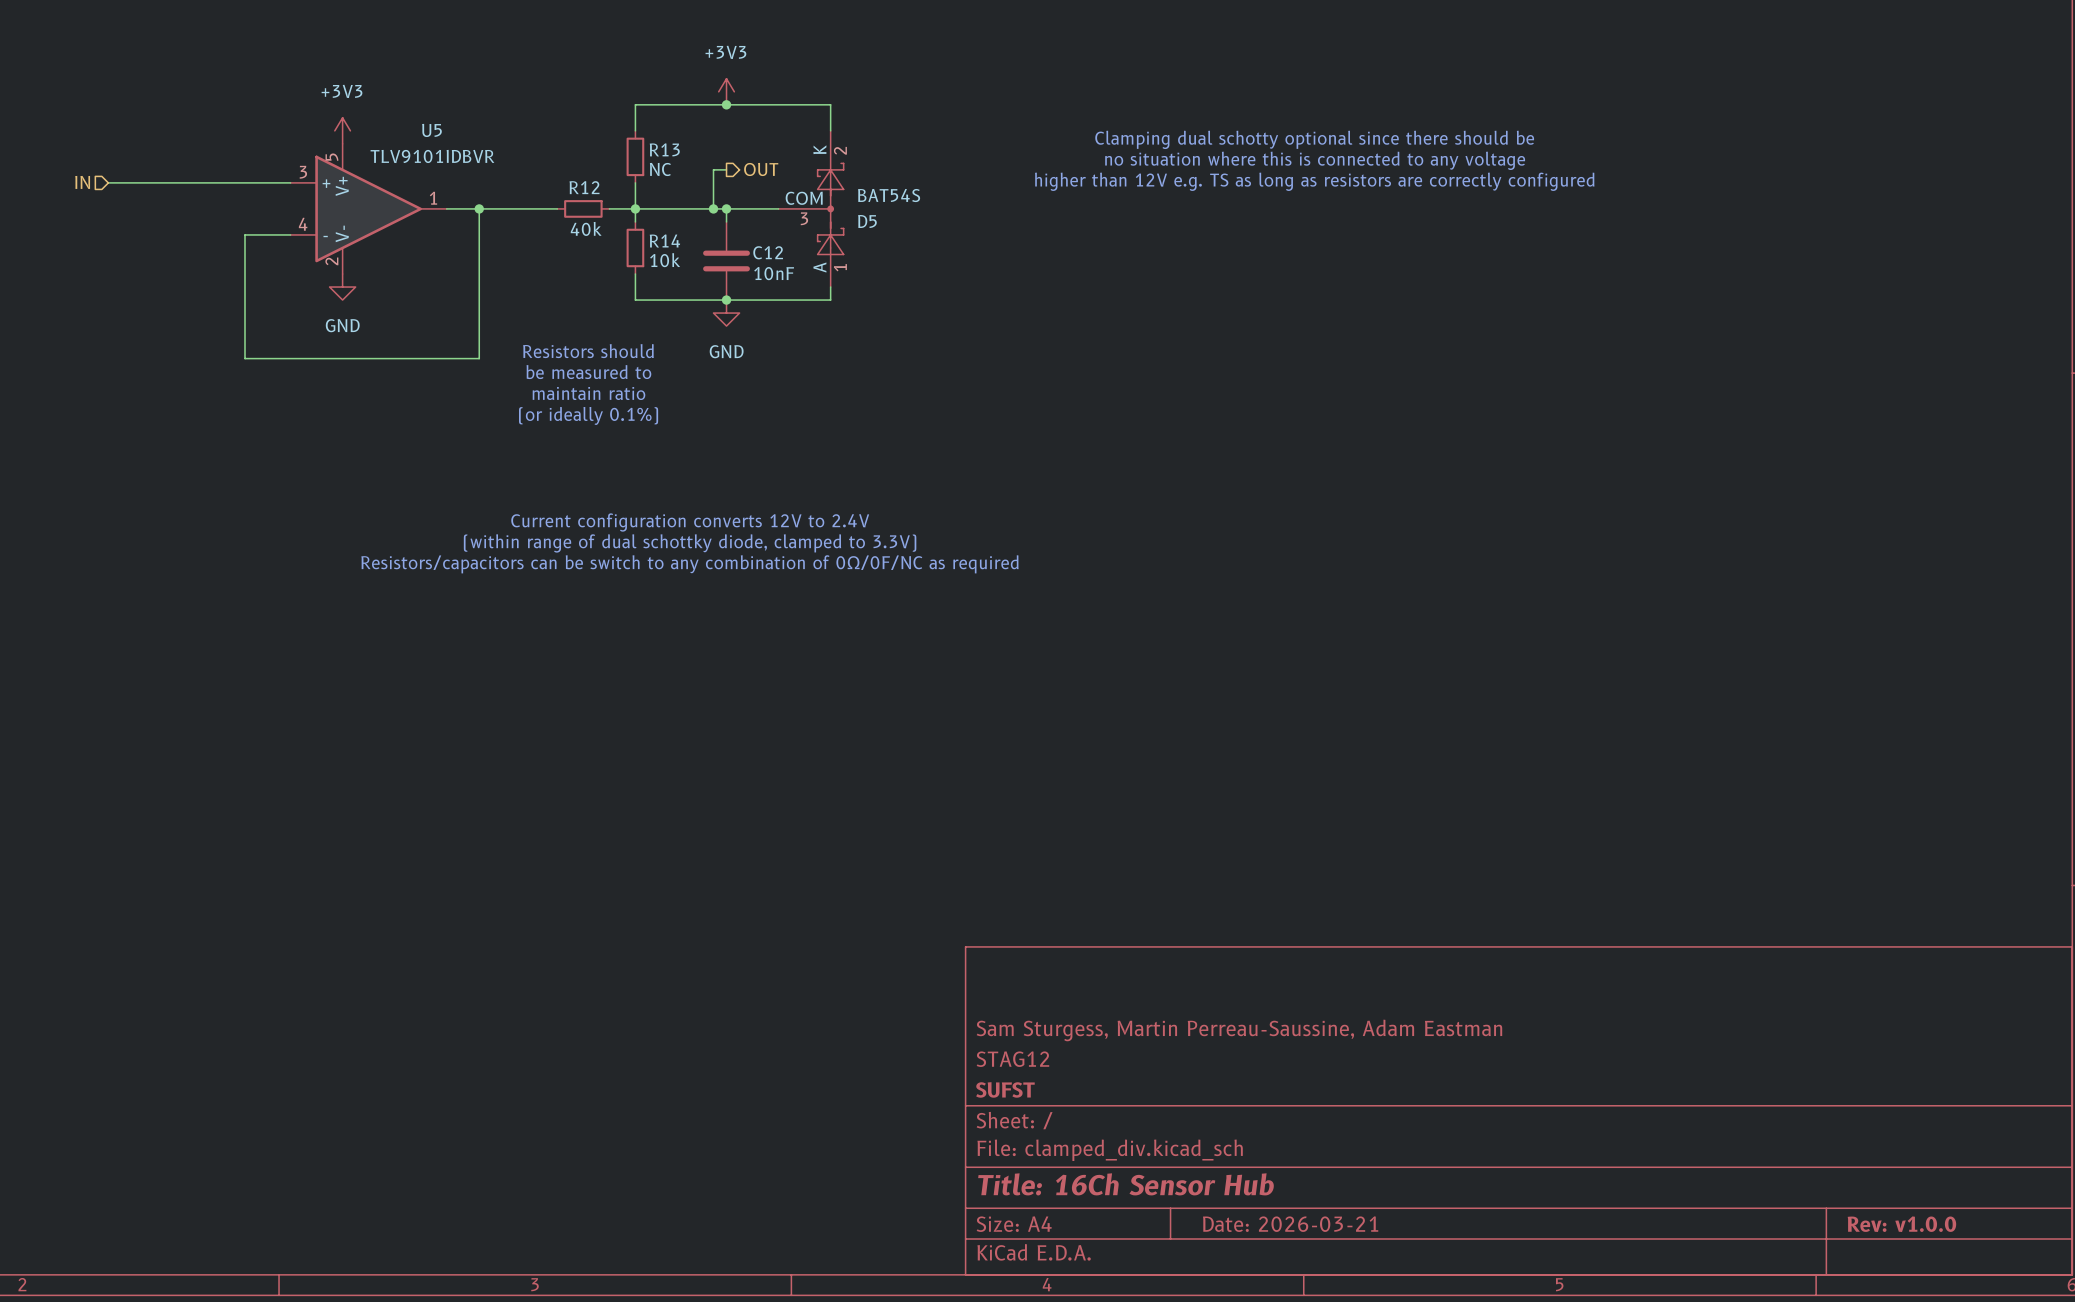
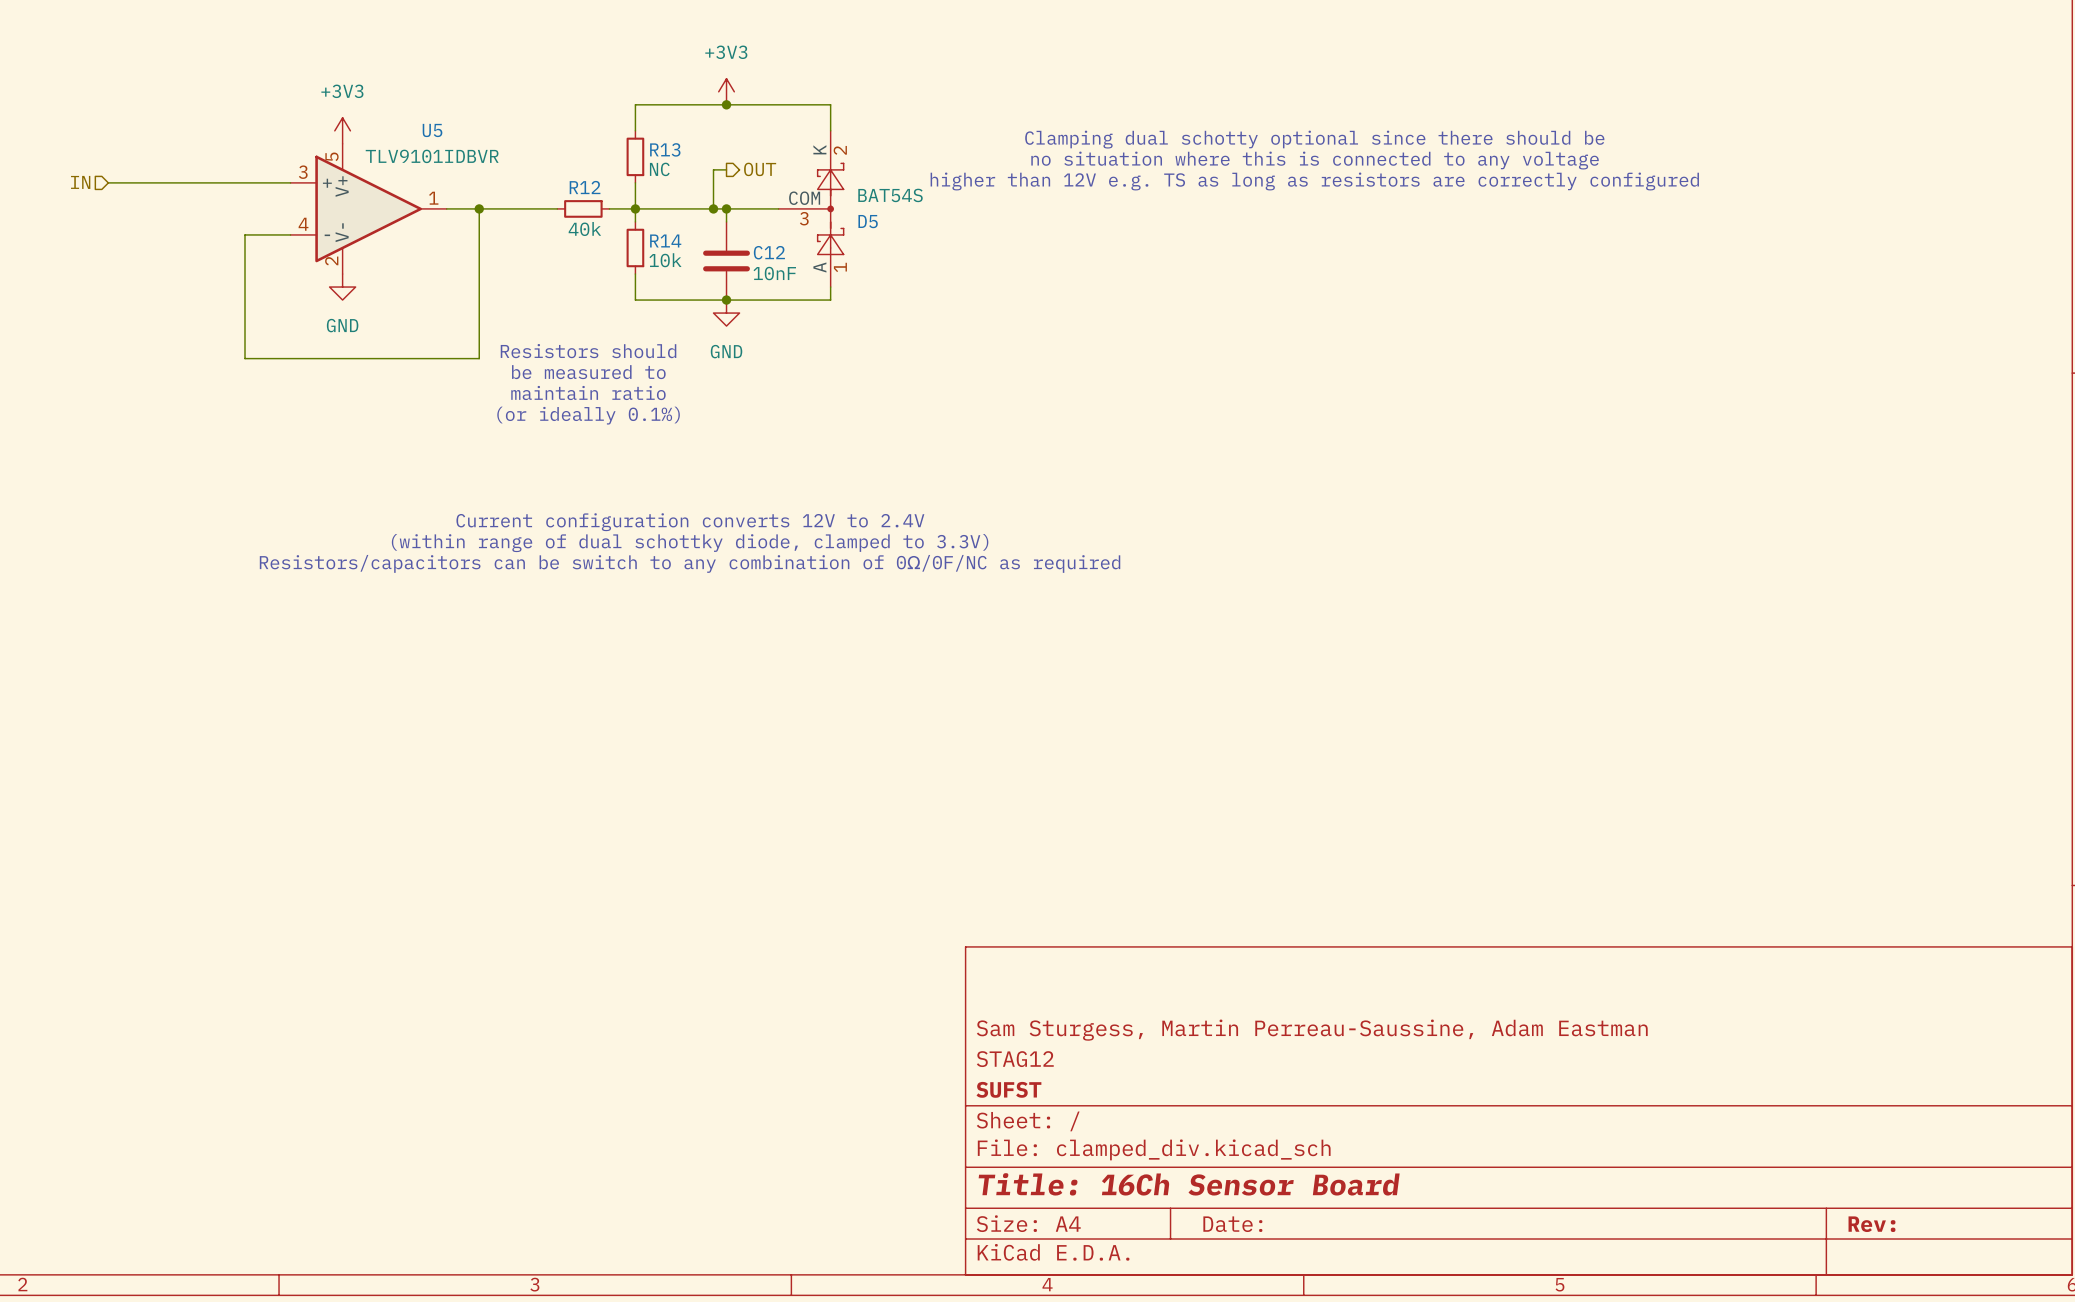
title block: Title: 16Ch Sensor Hub (1126, 1184) -> Title: 16Ch Sensor Board (1189, 1184)
title block: Date: 2026-03-21 (1290, 1224) -> Date: (1232, 1224)
title block: Rev: v1.0.0 (1901, 1224) -> Rev: (1871, 1224)

